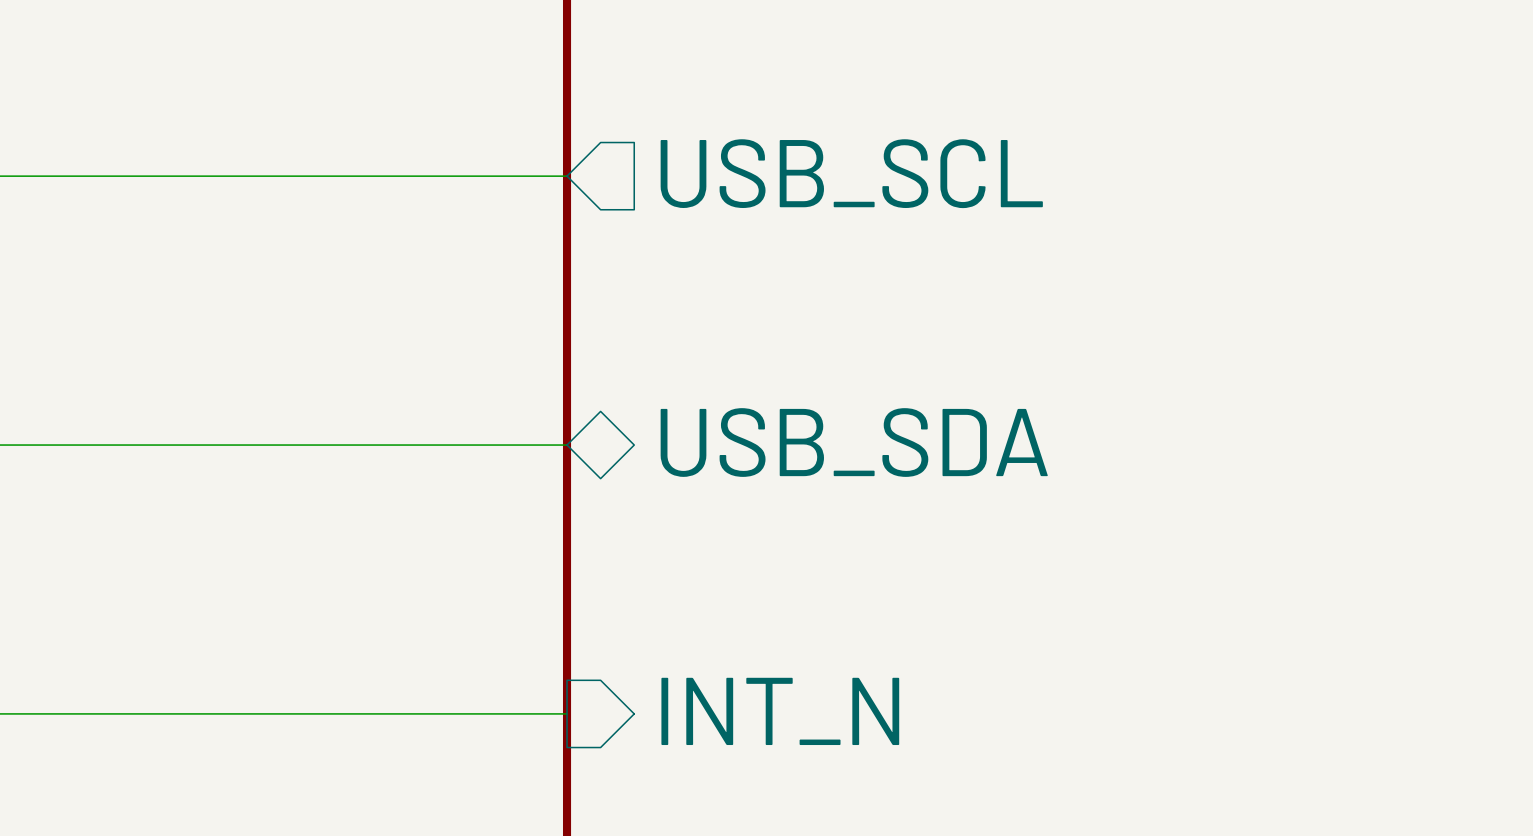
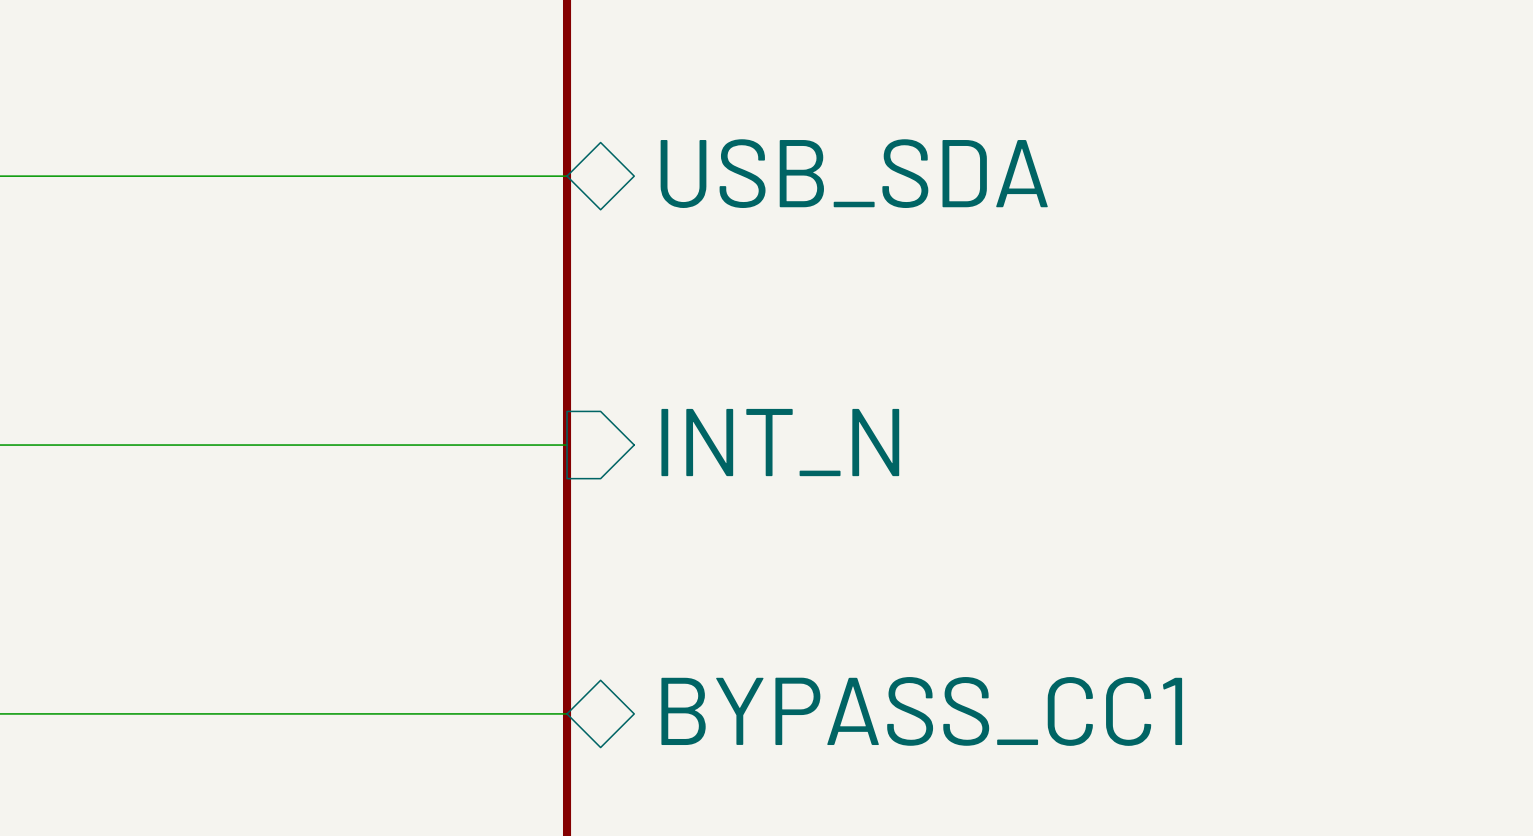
sheet pin shape: output (851, 173) -> bidirectional (854, 173)
sheet pin: USB_SCL (851, 173) -> USB_SDA (854, 173)
sheet pin shape: bidirectional (854, 442) -> input (780, 442)
sheet pin: USB_SDA (854, 442) -> INT_N (780, 442)
sheet pin shape: input (780, 711) -> bidirectional (921, 711)
sheet pin: INT_N (780, 711) -> BYPASS_CC1 (921, 711)

